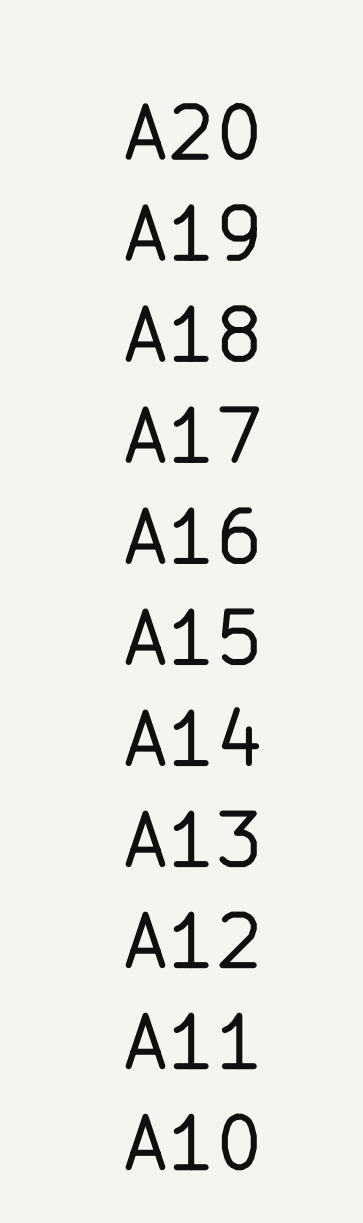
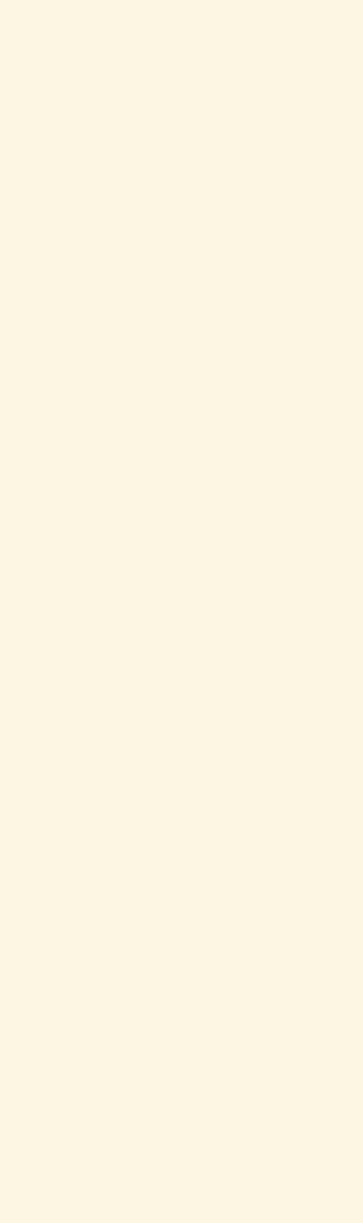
label: A20 (191, 131) -> none
label: A19 (191, 232) -> none
label: A18 (191, 333) -> none
label: A17 (192, 434) -> none
label: A16 (191, 535) -> none
label: A15 (191, 636) -> none
label: A14 (192, 736) -> none
label: A13 (191, 838) -> none
label: A12 (191, 939) -> none
label: A11 (191, 1040) -> none
label: A10 (191, 1141) -> none

